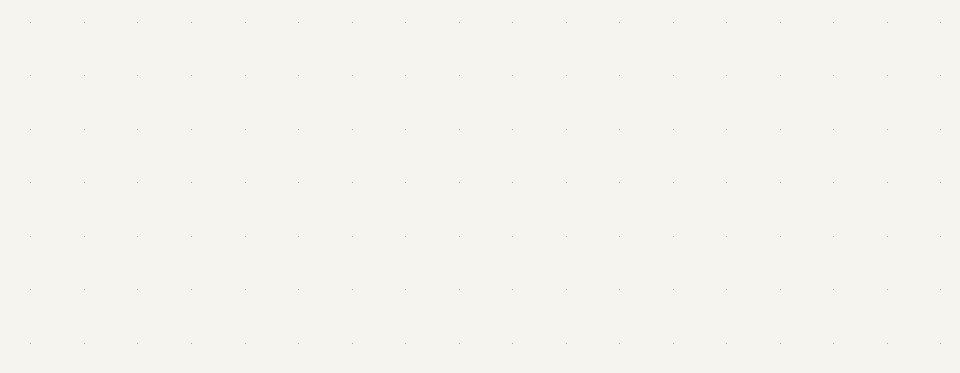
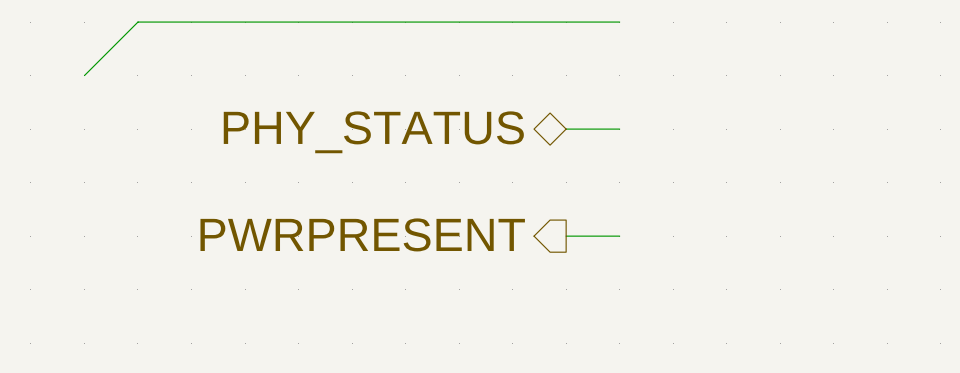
wire: none -> (619, 22) (137, 22) (84, 75)
wire: none -> (566, 129) (619, 129)
hierarchical label: none -> PHY_STATUS (373, 132)
hierarchical label: none -> PWRPRESENT (362, 234)
wire: none -> (566, 236) (619, 236)

